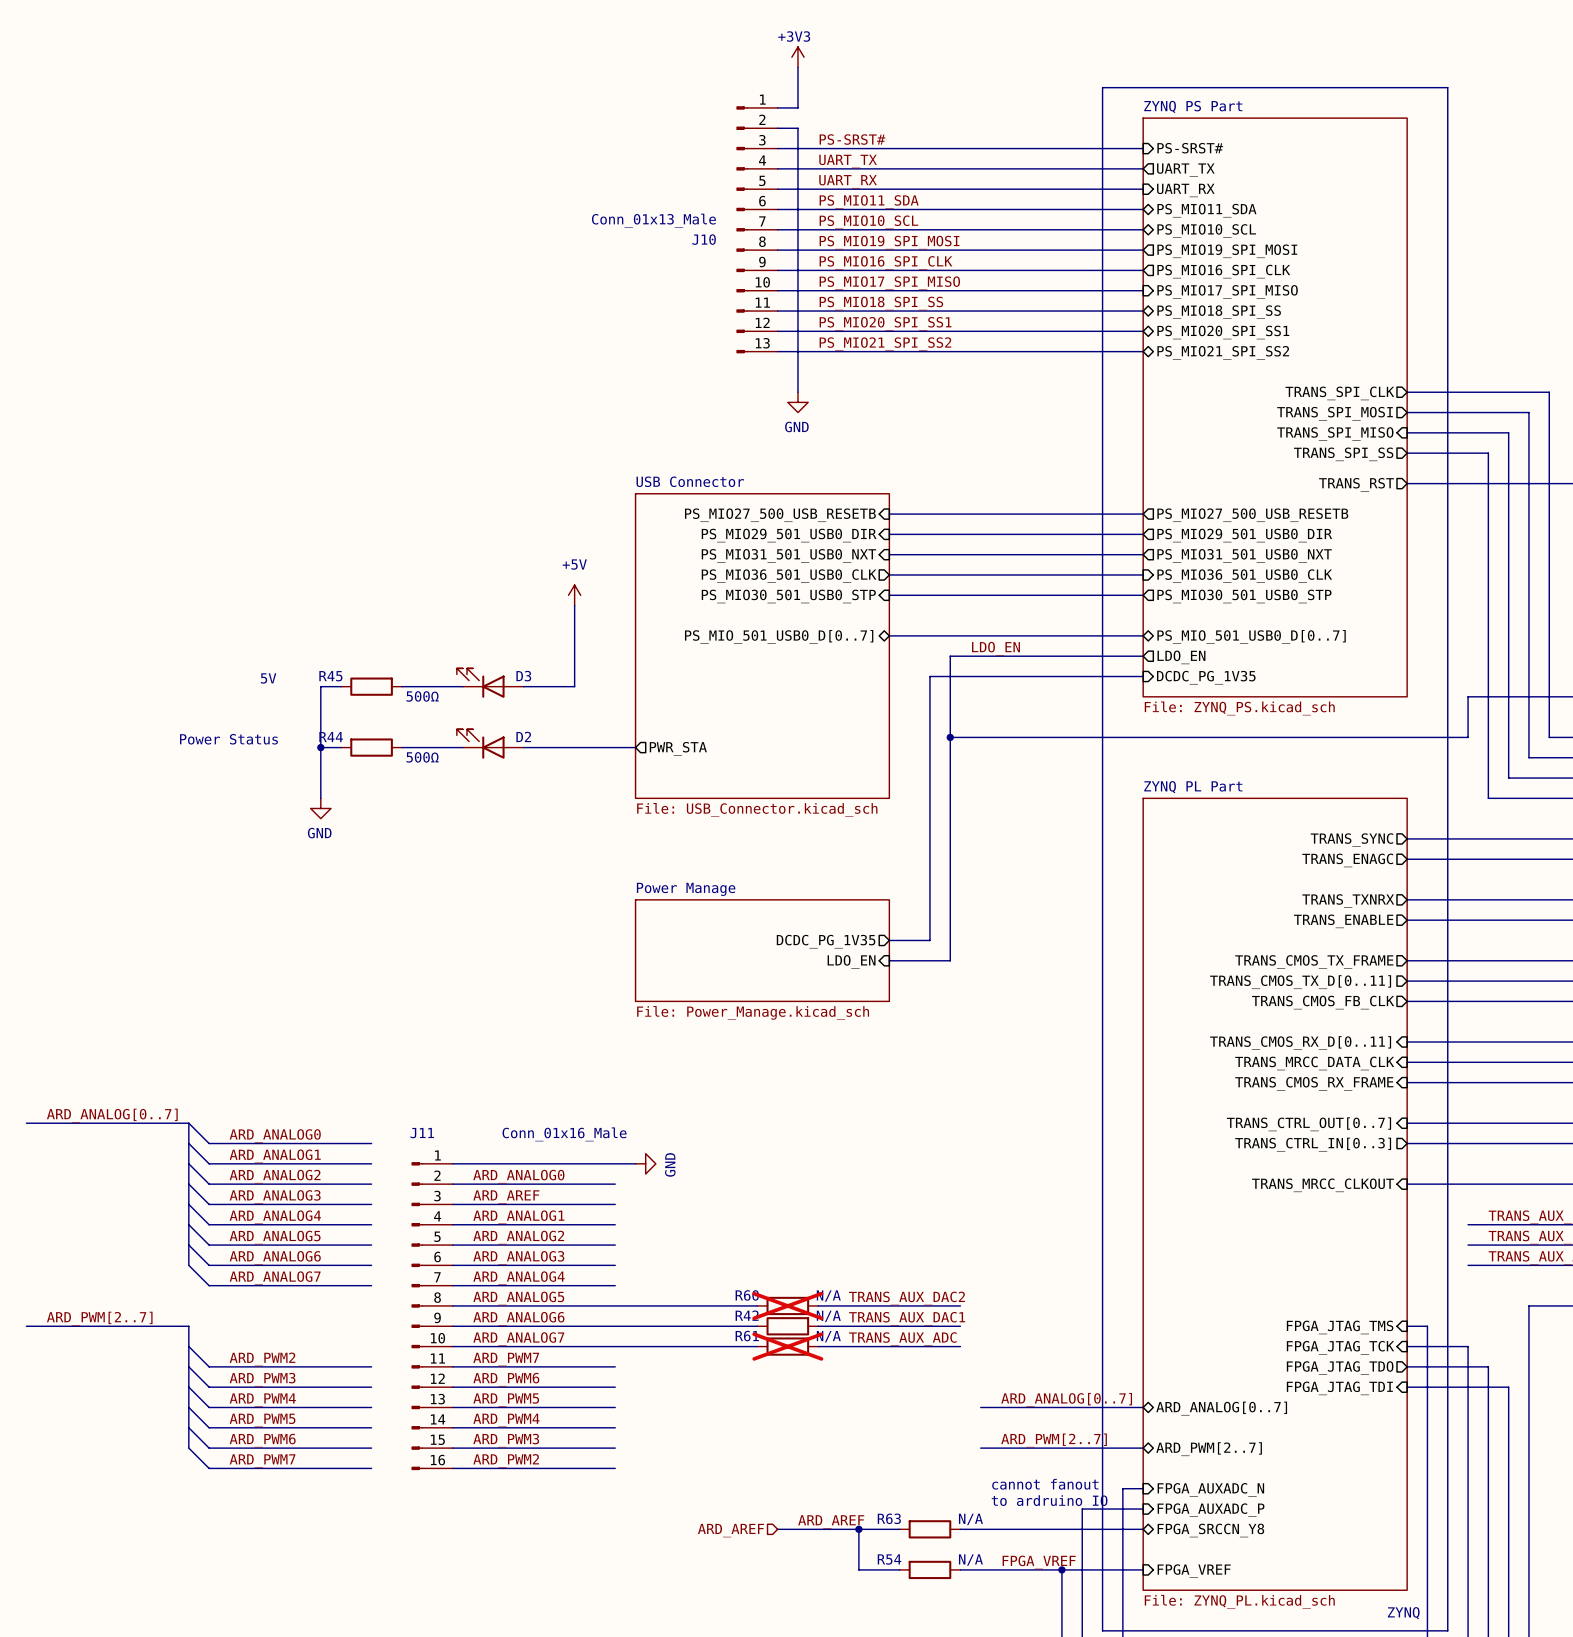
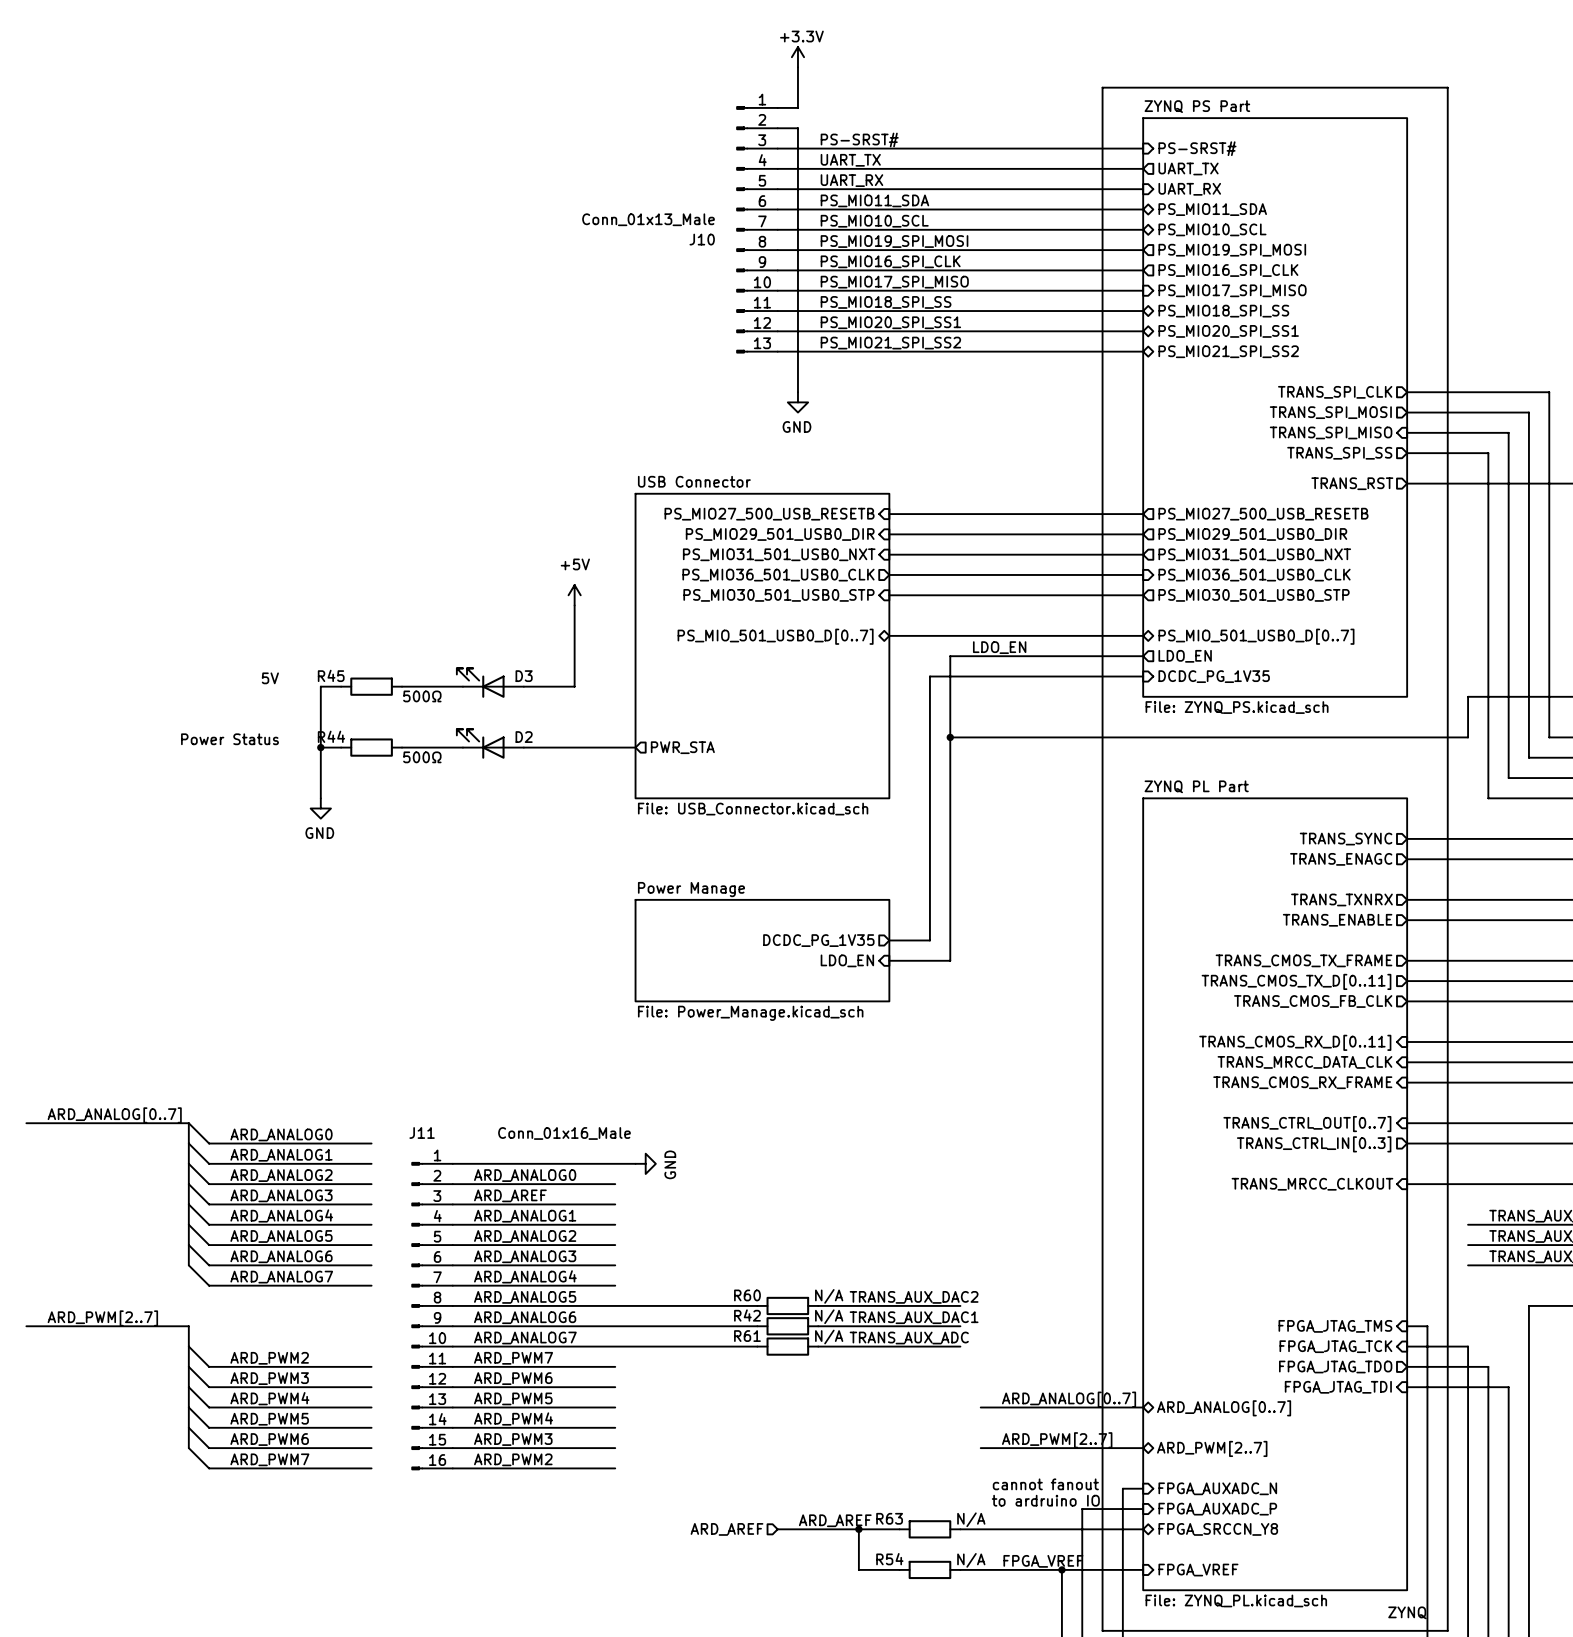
power symbol: +3V3 (797, 57) -> +3.3V (797, 57)
R60 do-not-place cross: (787, 1305) -> none
R61 do-not-place cross: (787, 1346) -> none

